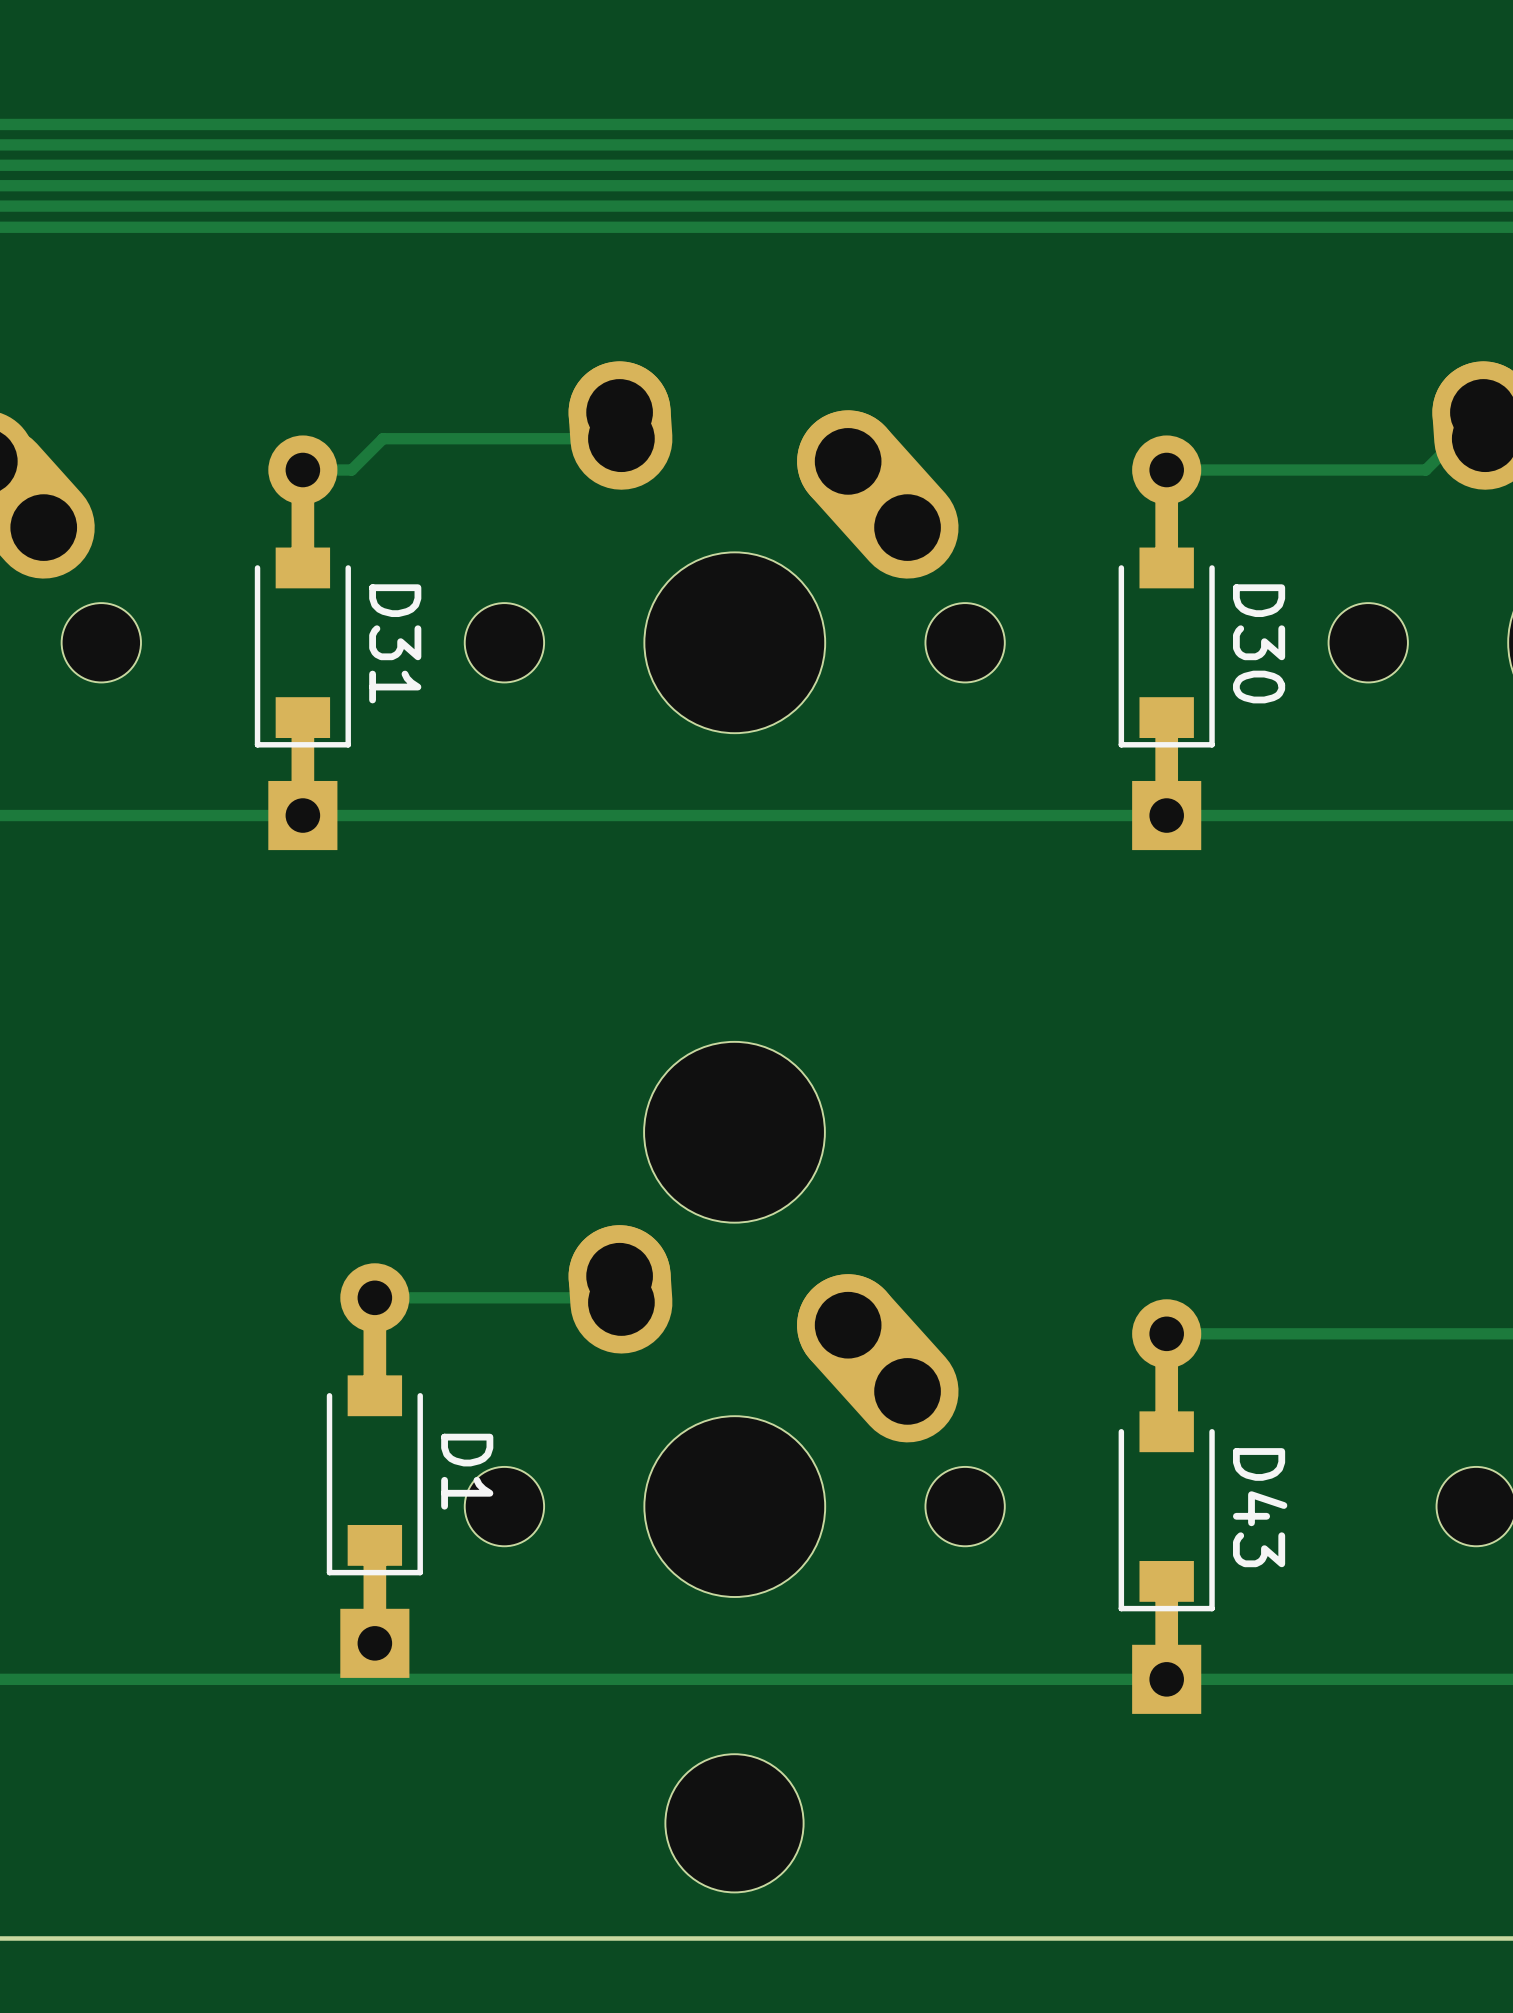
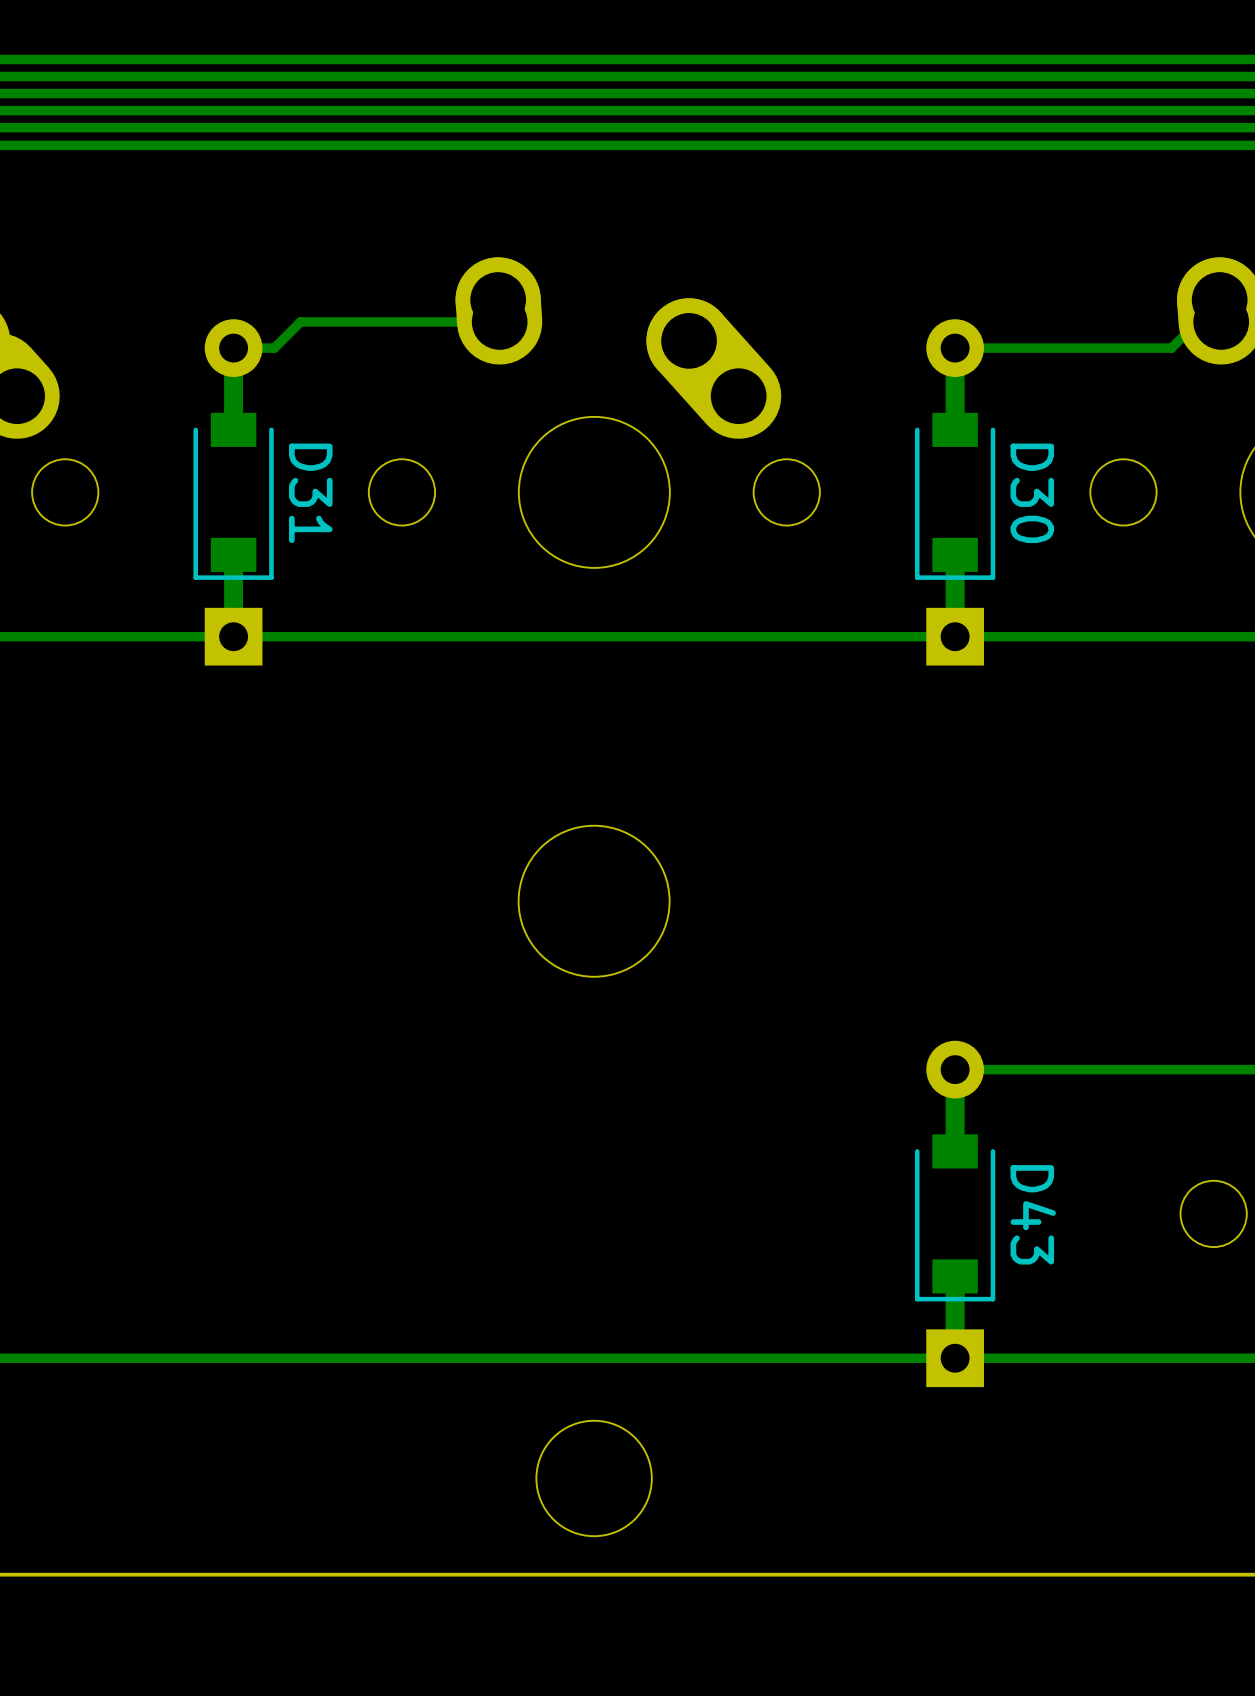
track: (374, 1297) (616, 1297) (621, 1302) -> none
part: (734, 1411) -> none
D1: (374, 1470) -> none

